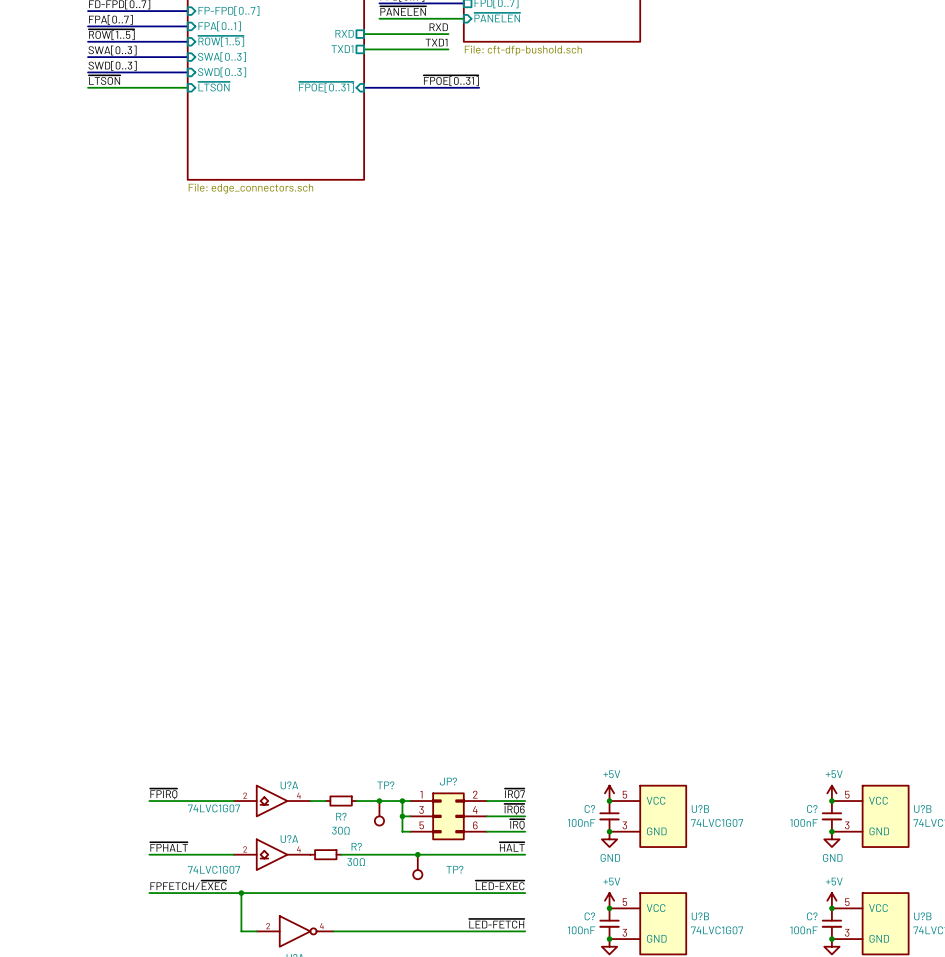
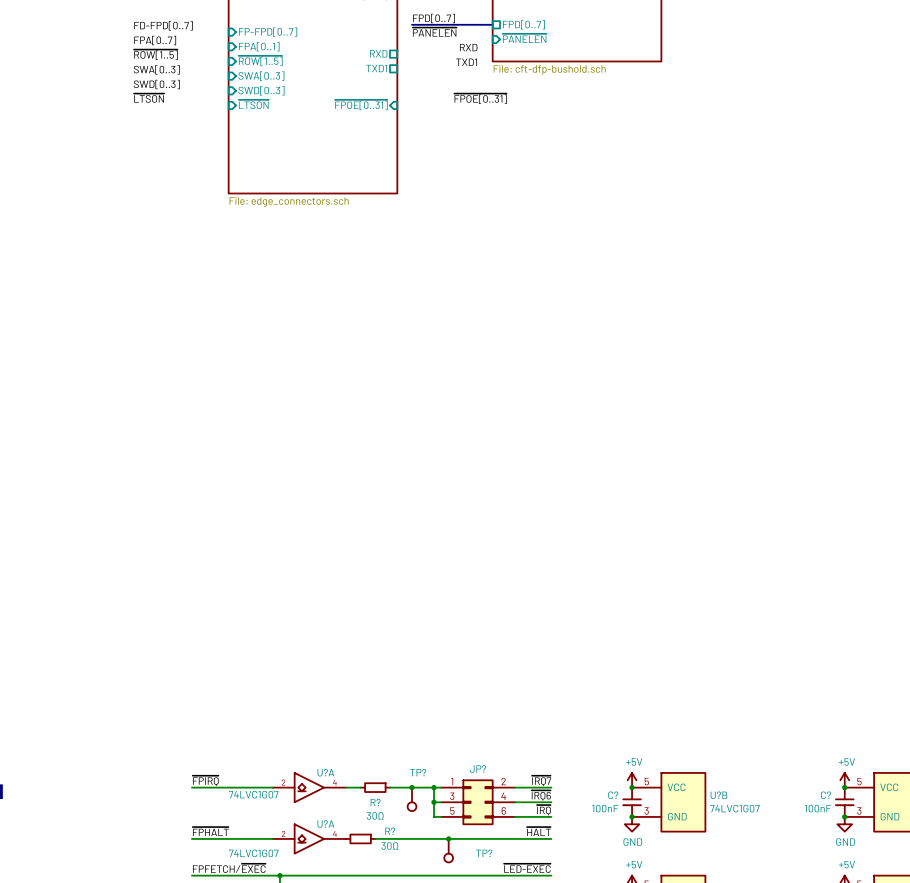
bus: (88, 11) (187, 11) -> none
wire: (379, 18) (463, 18) -> none
bus: (88, 26) (187, 26) -> none
wire: (364, 34) (448, 34) -> none
bus: (88, 41) (187, 41) -> none
wire: (364, 49) (448, 49) -> none
bus: (88, 57) (187, 57) -> none
bus: (88, 72) (187, 72) -> none
wire: (88, 87) (187, 87) -> none
bus: (364, 87) (479, 87) -> none

